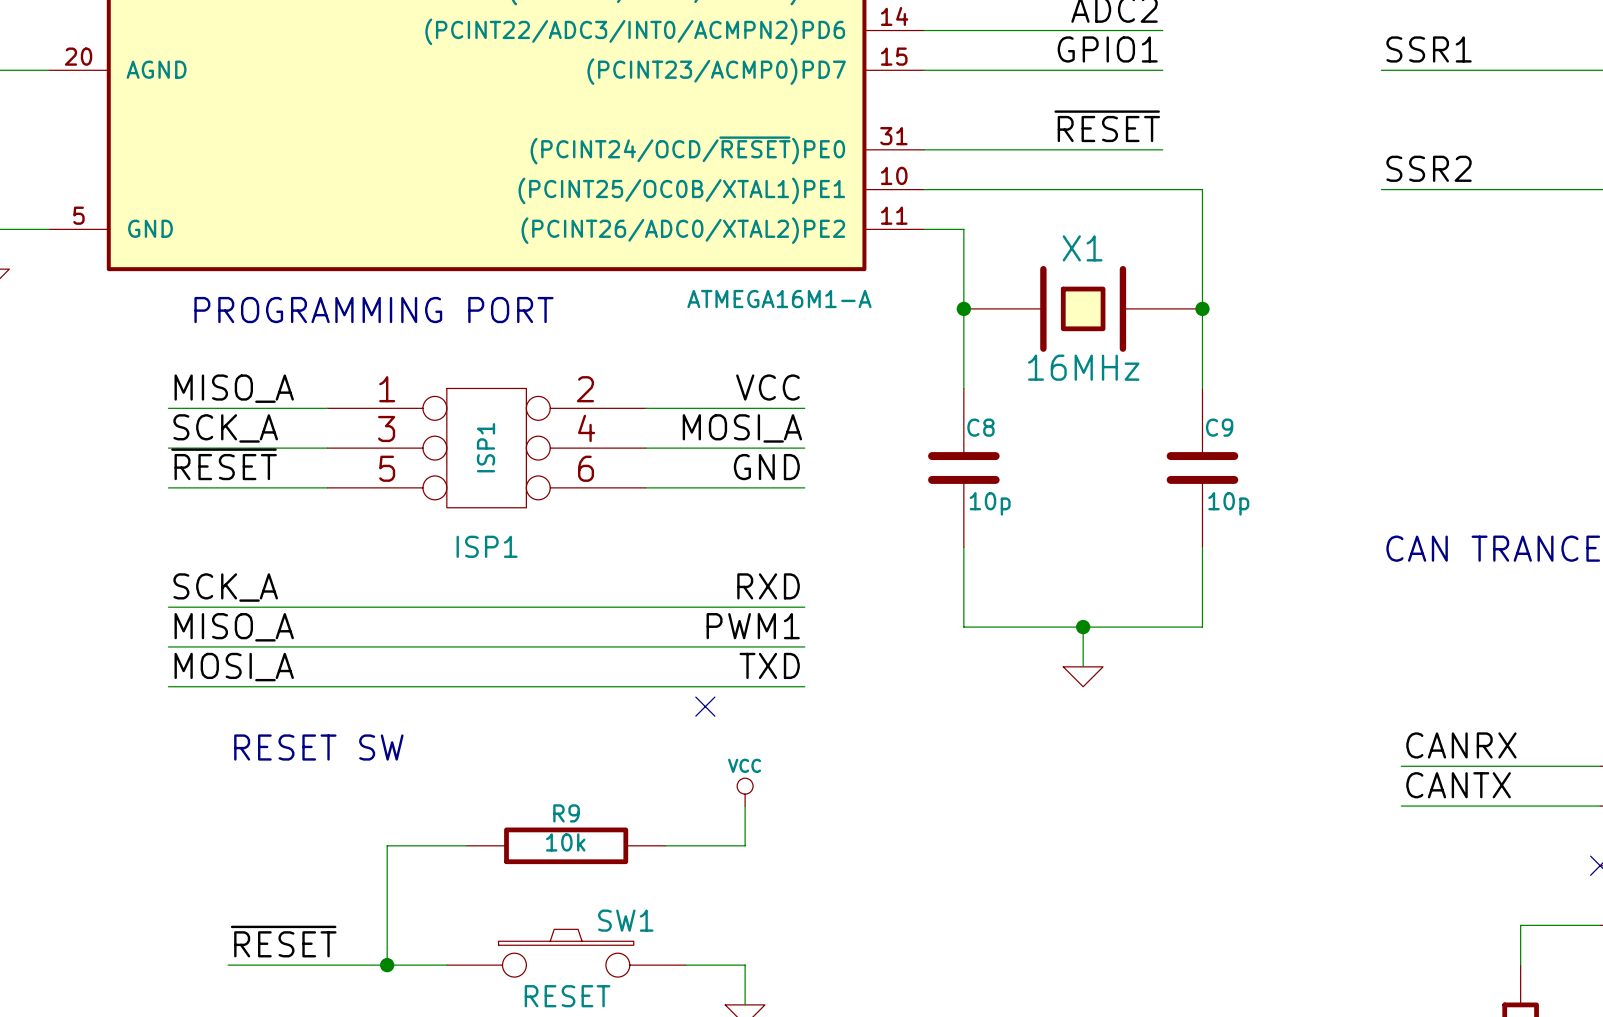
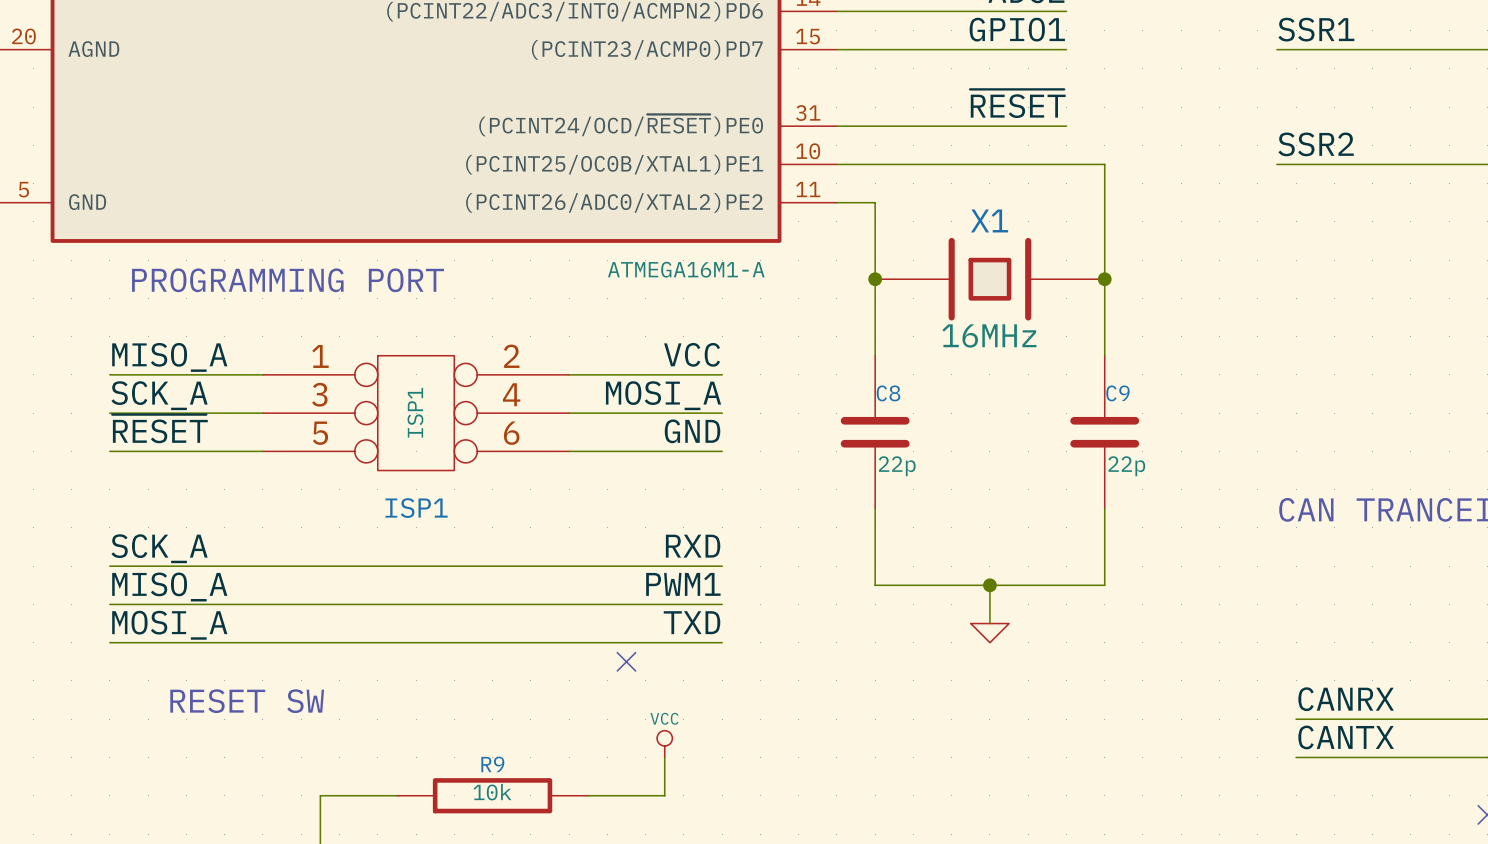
C8 value: 10p (990, 503) -> 22p (897, 466)
C9 value: 10p (1228, 503) -> 22p (1126, 466)

